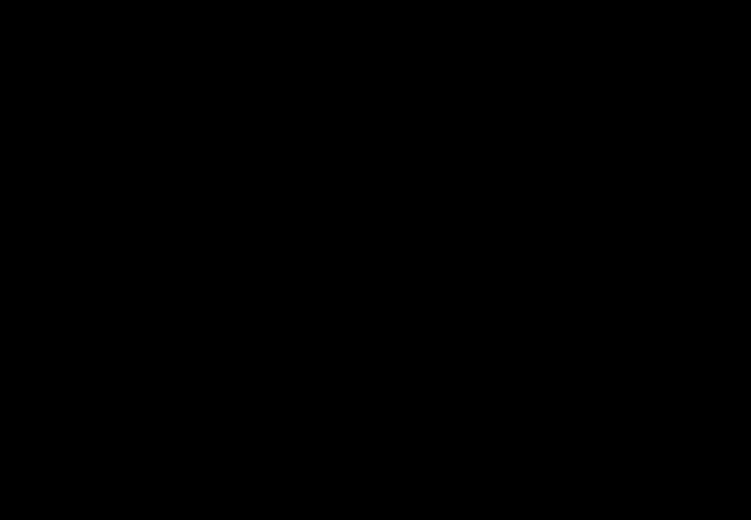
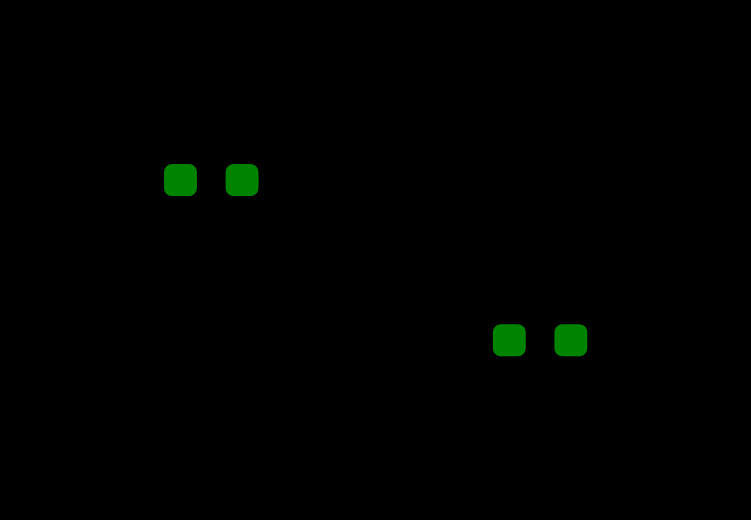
part: none -> (211, 180)
part: none -> (540, 340)

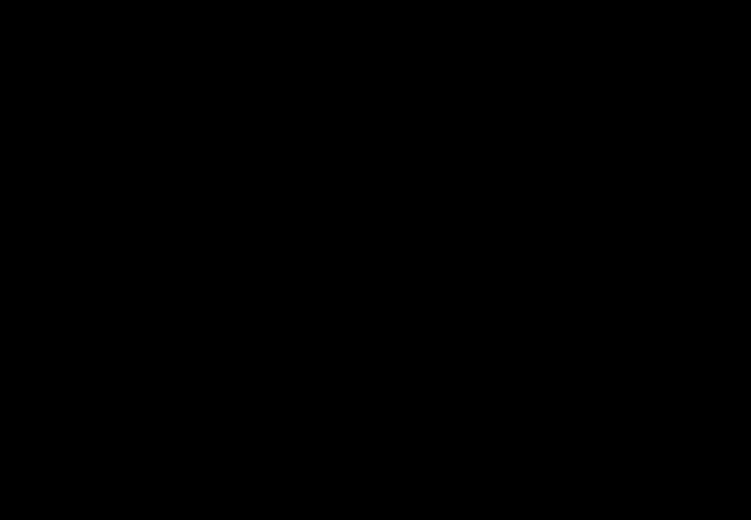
part: (211, 180) -> none
part: (540, 340) -> none

